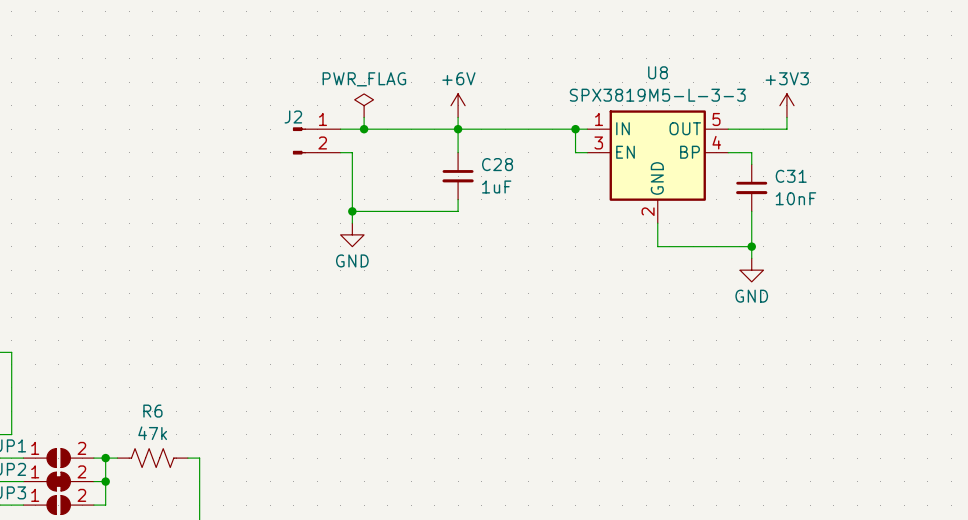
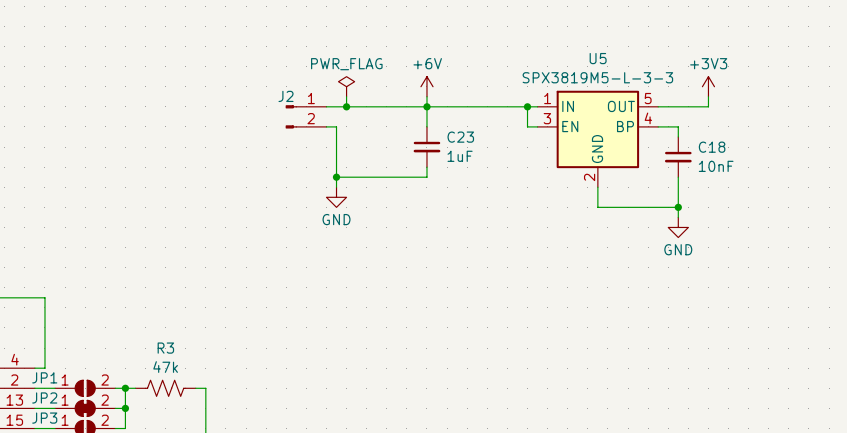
U8 name: U8 (658, 72) -> U5 (598, 58)
C28 name: C28 (497, 164) -> C23 (460, 137)
C31 name: C31 (791, 176) -> C18 (712, 147)
R6 name: R6 (152, 411) -> R3 (165, 348)

